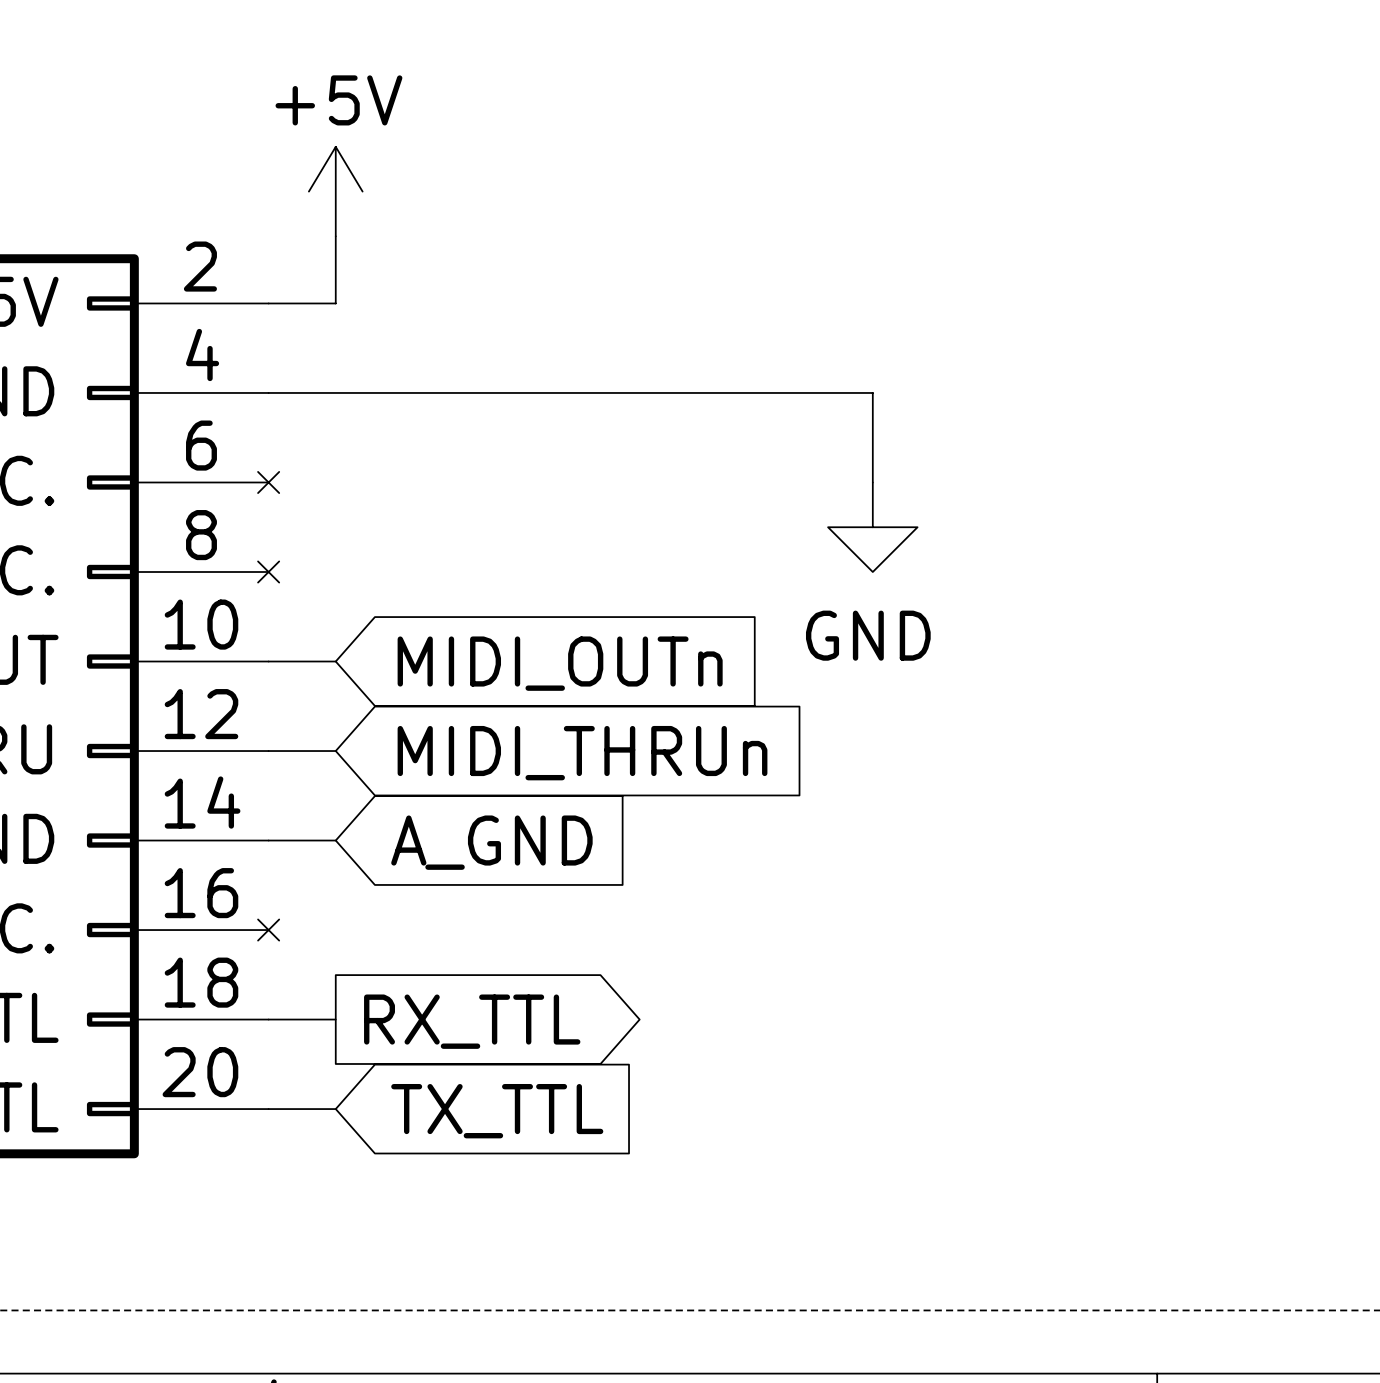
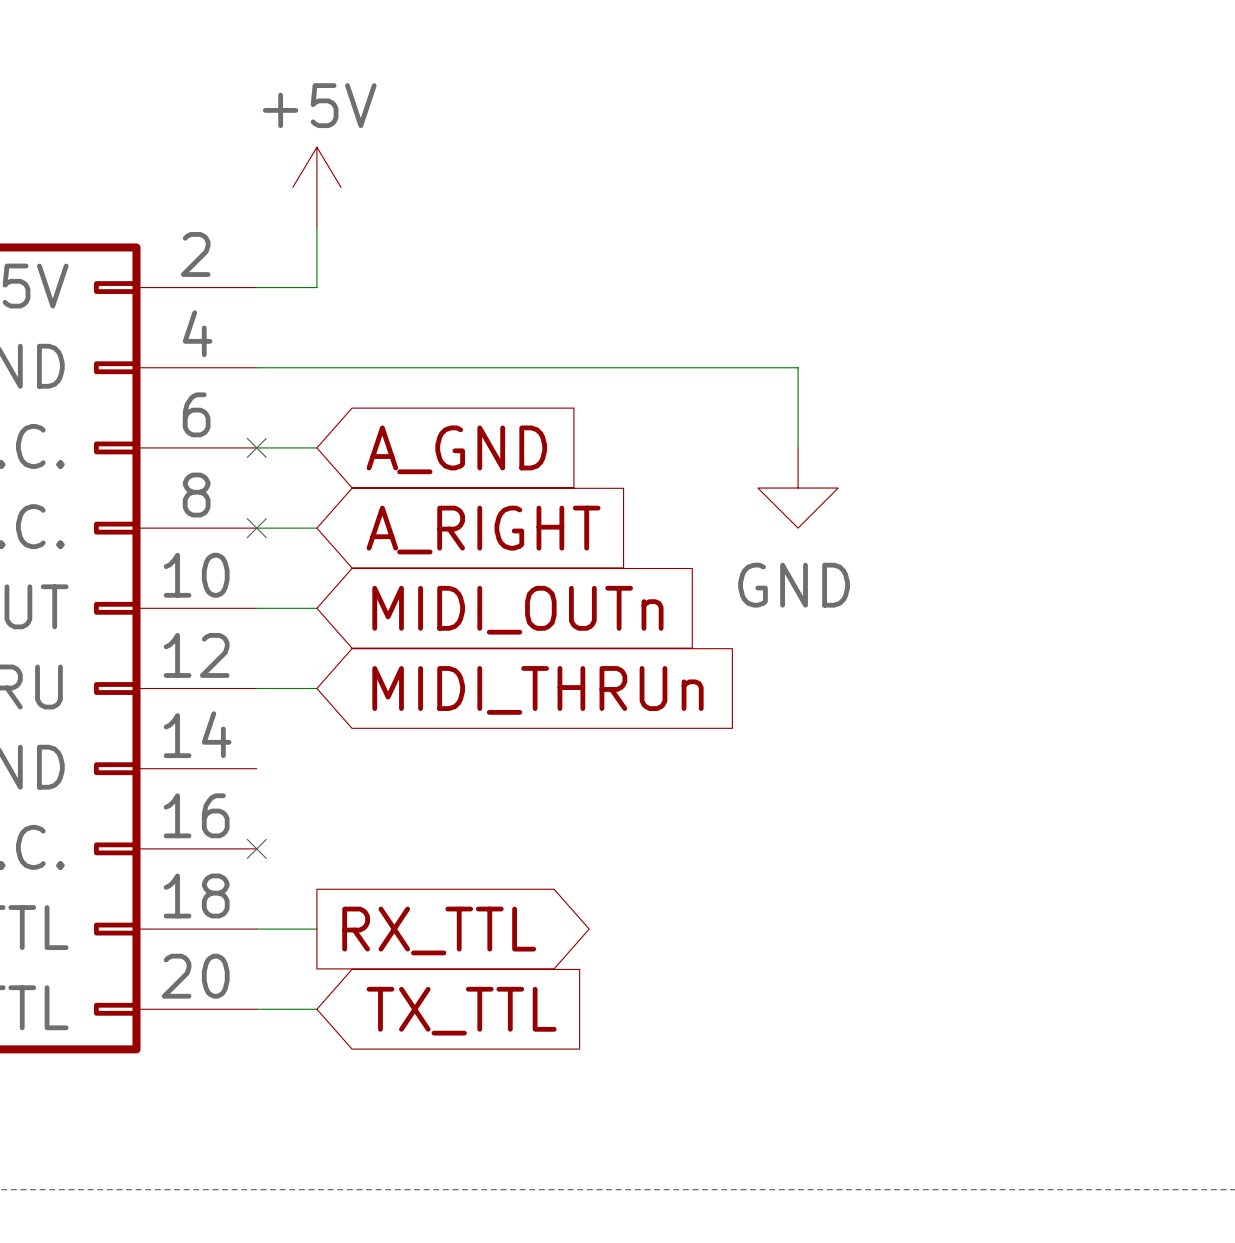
wire: none -> (256, 447) (316, 447)
global label: none -> A_RIGHT (483, 530)
wire: (268, 840) (335, 840) -> (256, 528) (316, 528)
global label position: A_GND (491, 842) -> A_GND (456, 449)

